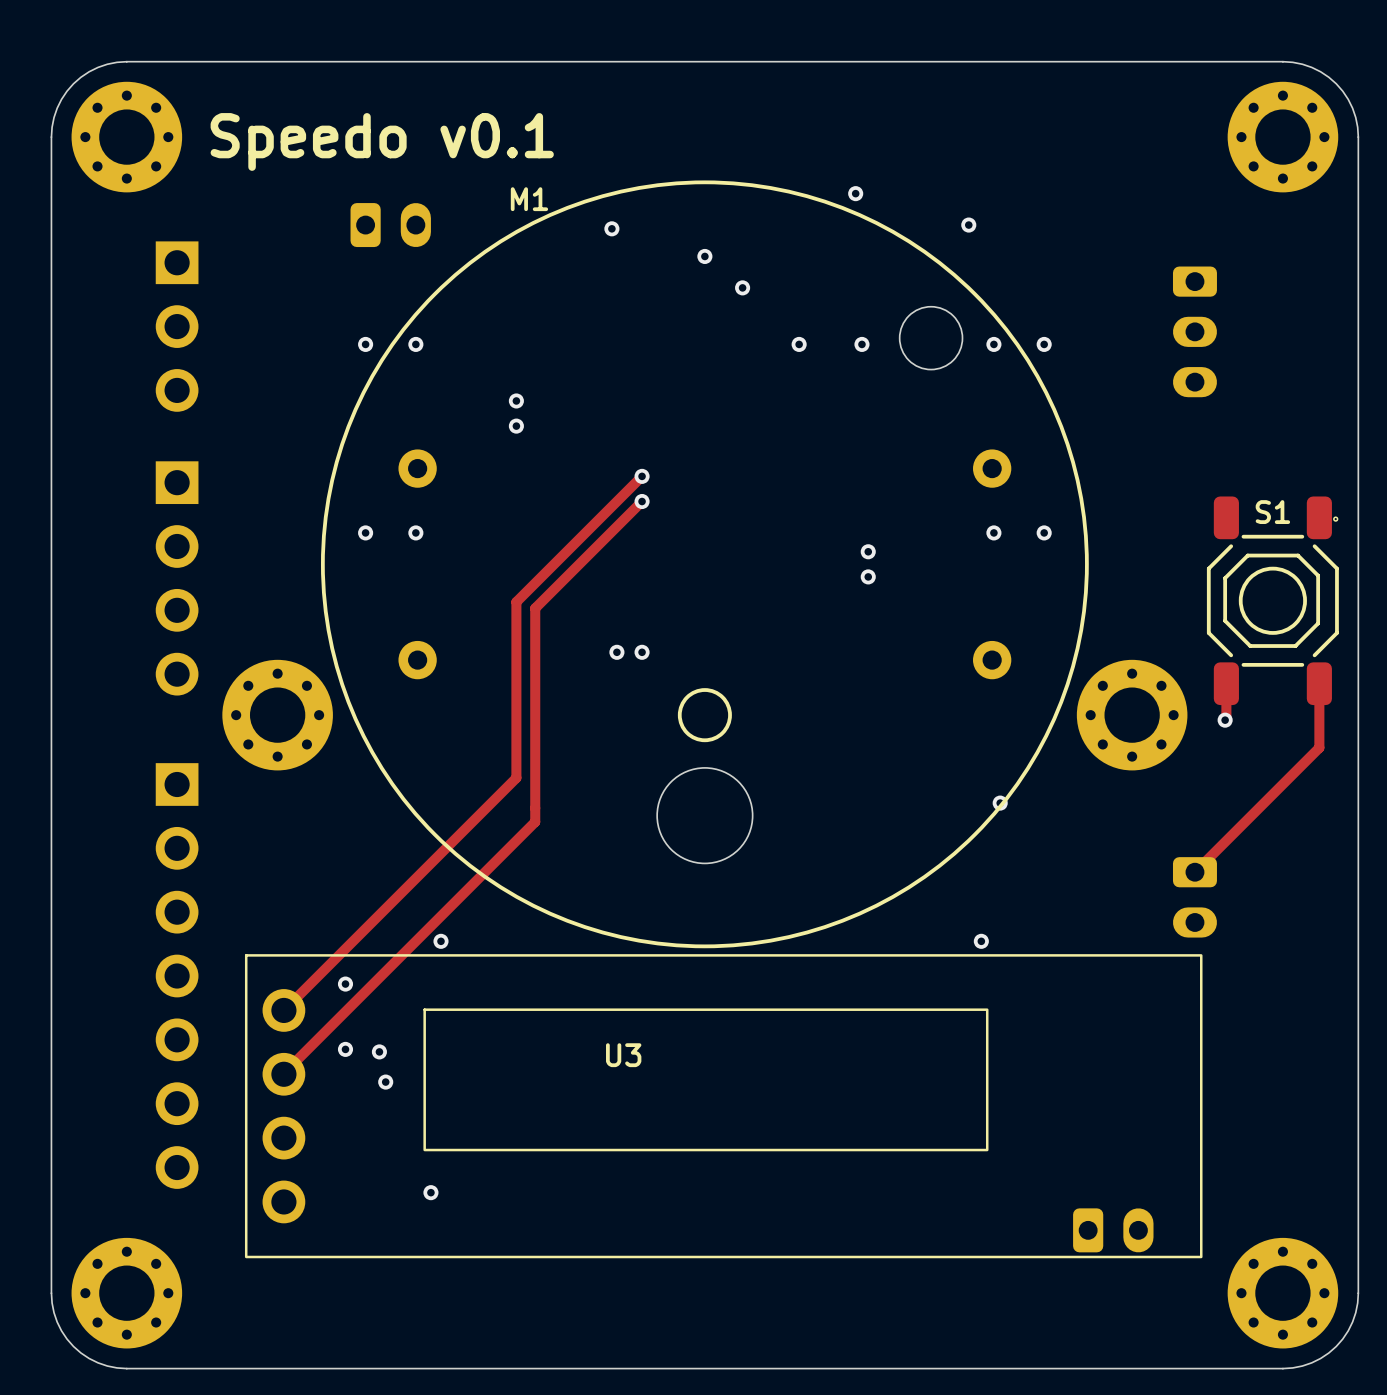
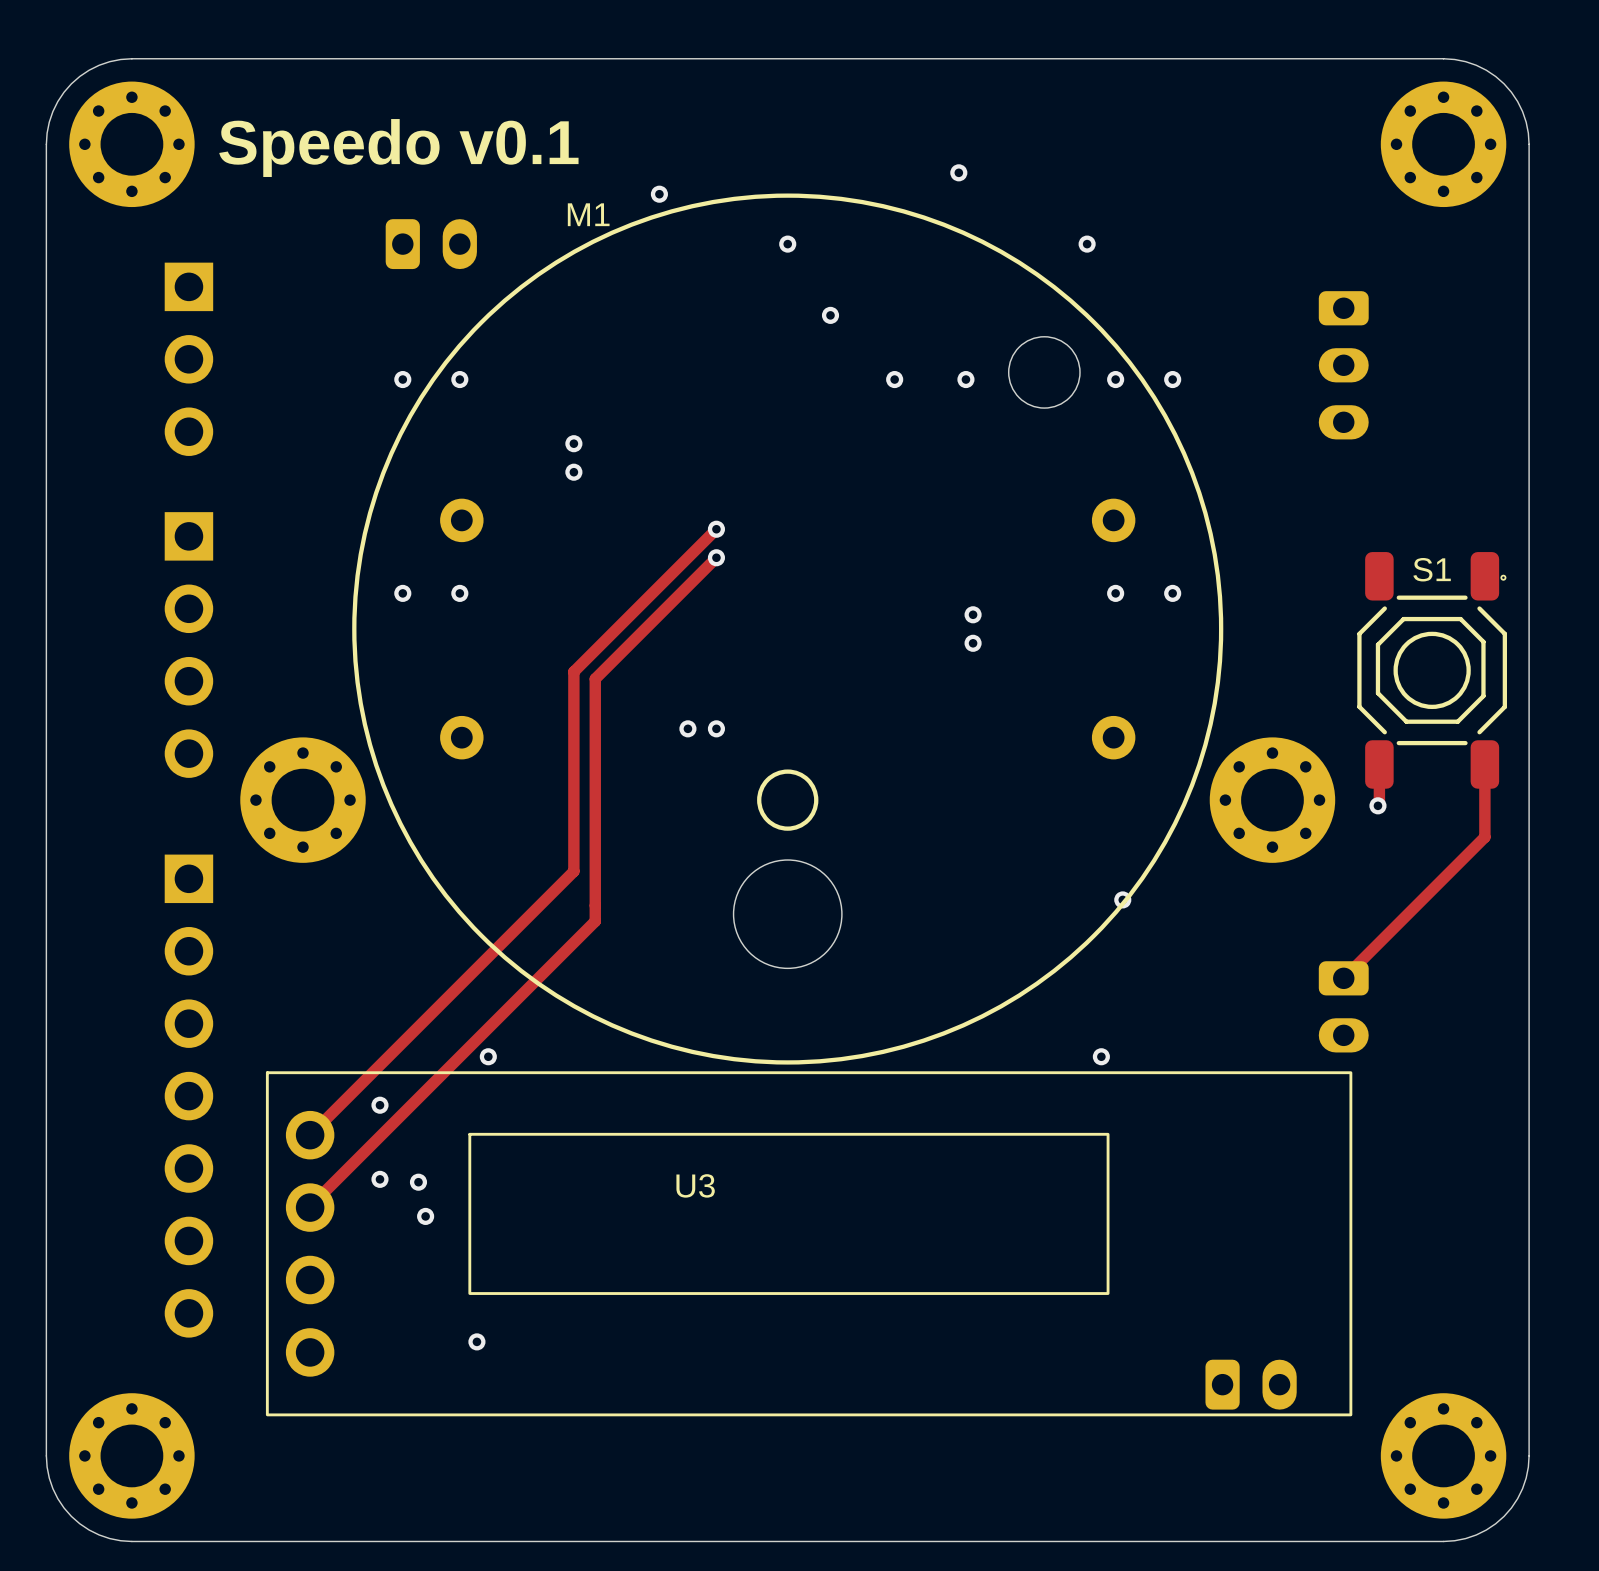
via: none -> (659, 194)
via position: (855, 193) -> (958, 172)
via: (611, 228) -> none
via position: (704, 256) -> (787, 244)

